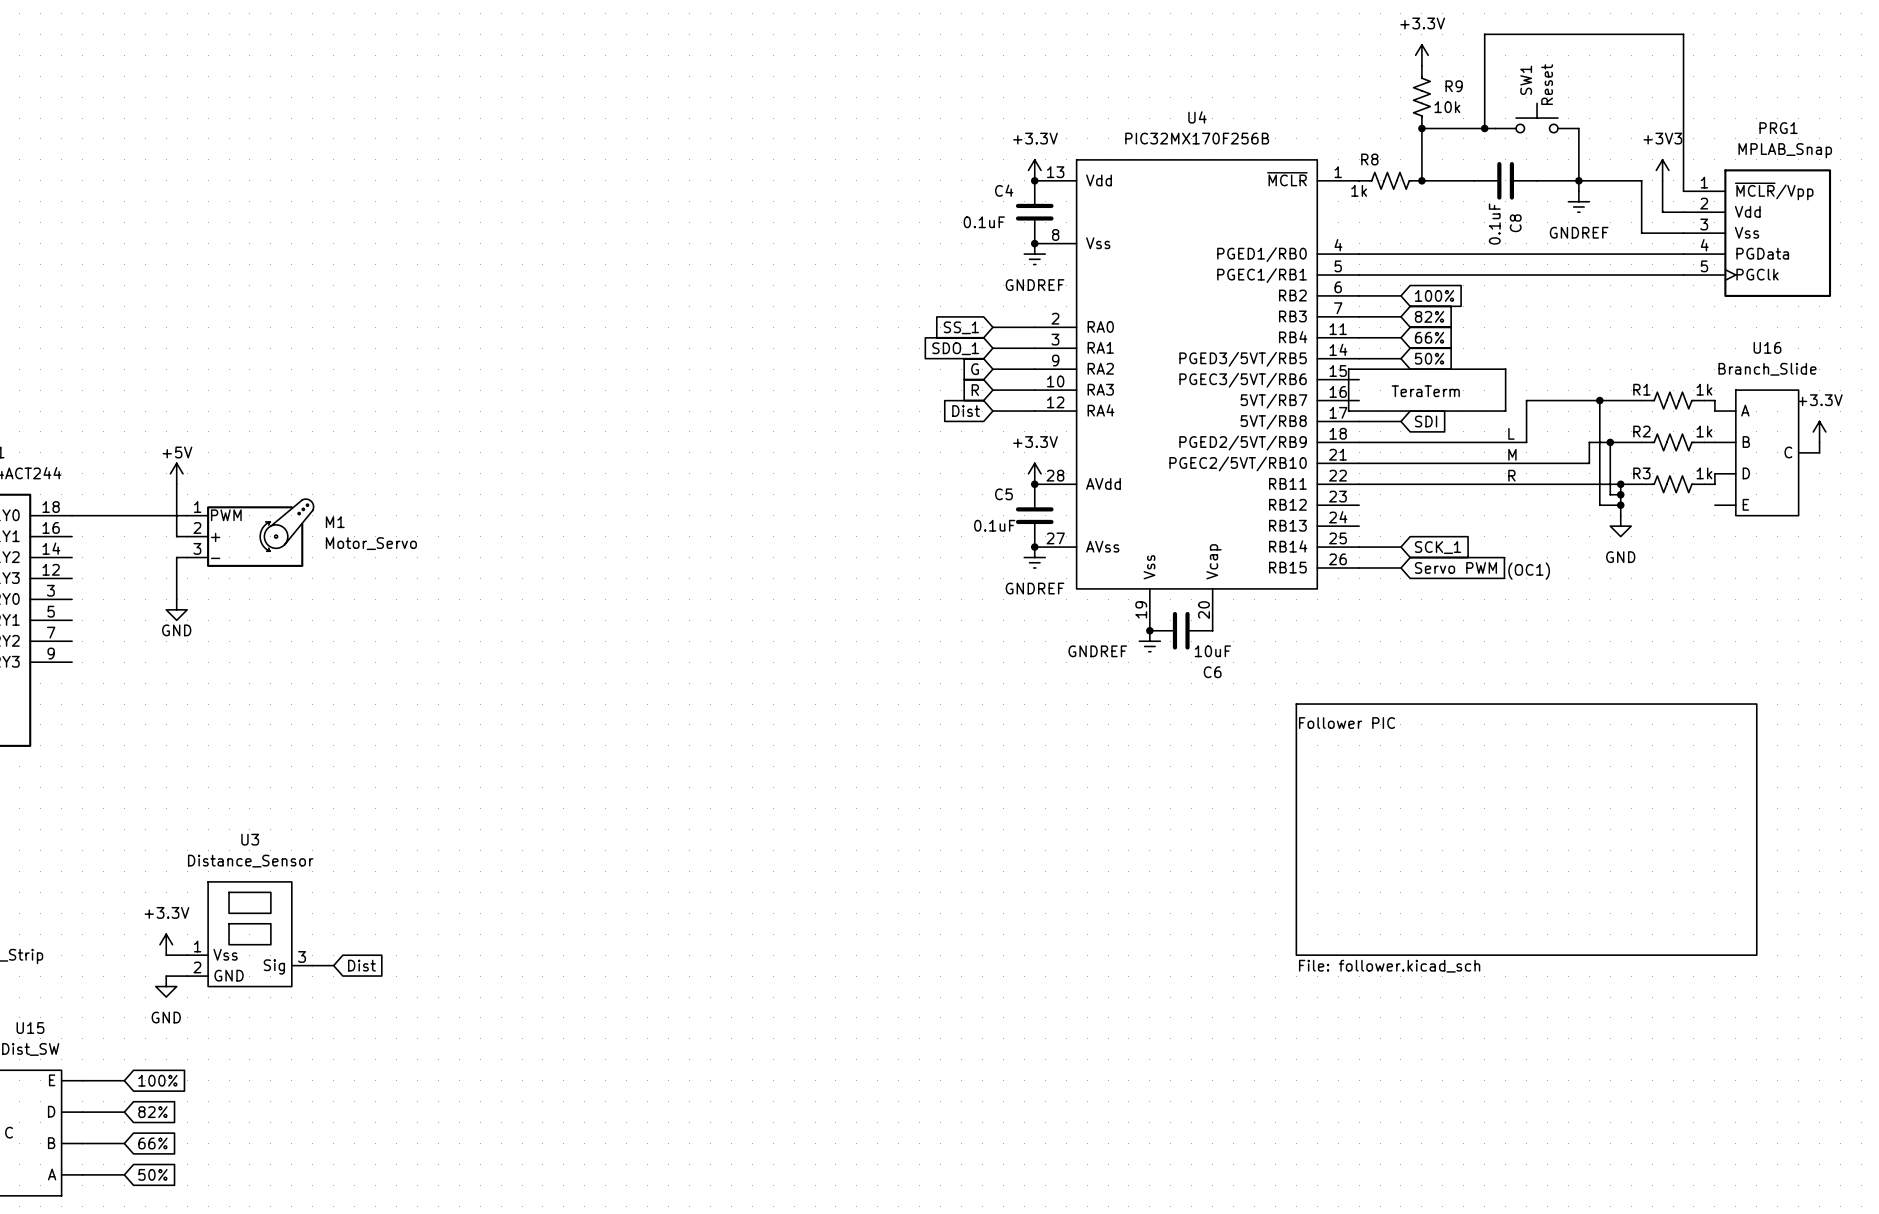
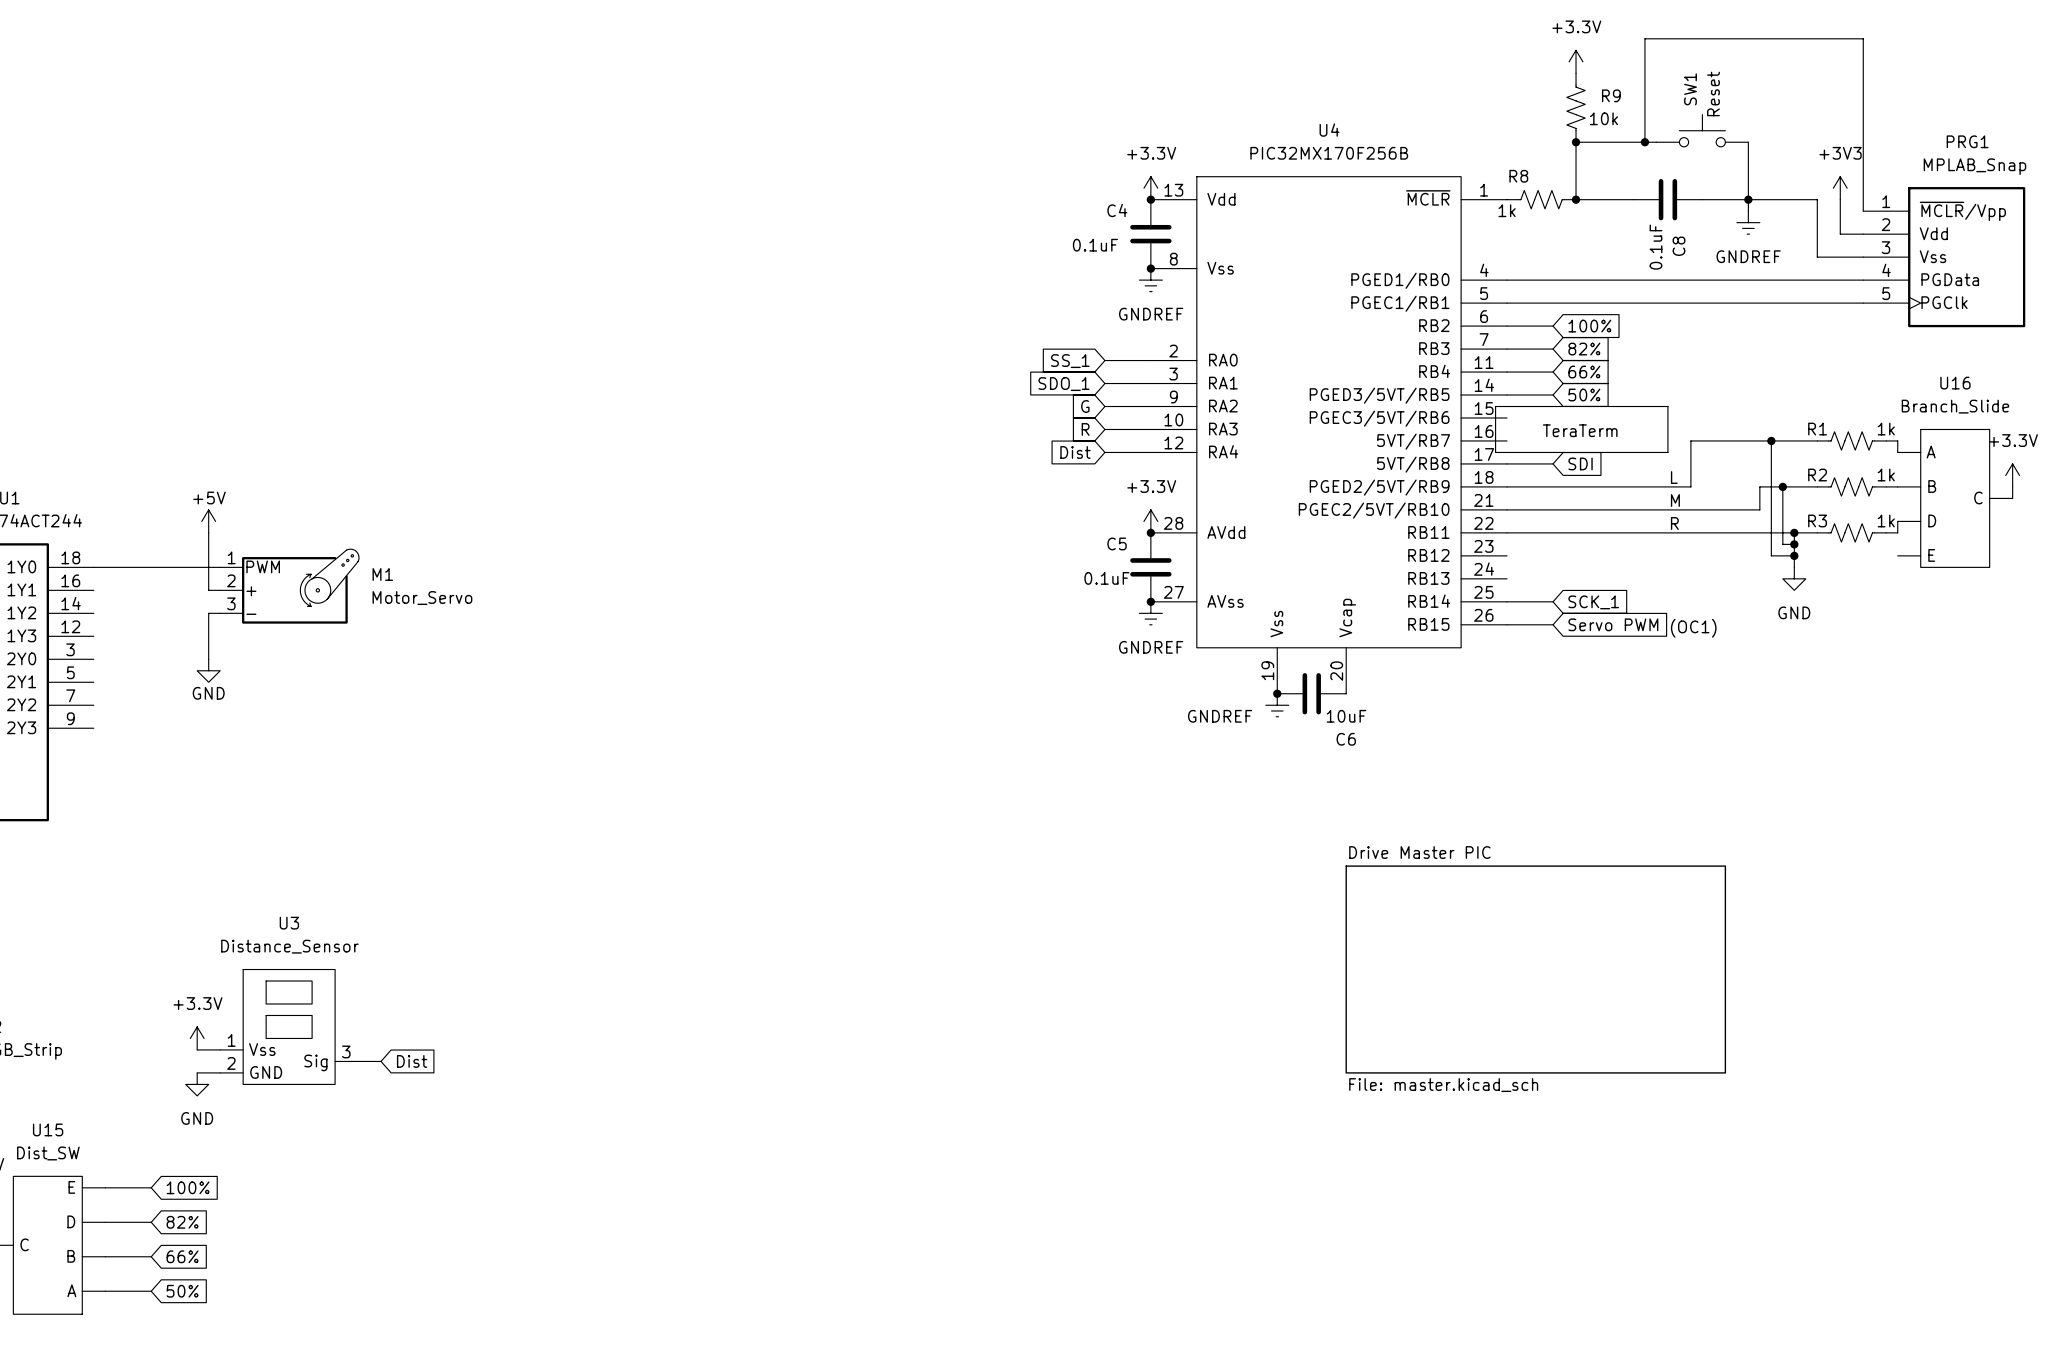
sheet Follower PIC: File: follower.kicad_sch (1526, 829) -> none
sheet Drive Master PIC: none -> File: master.kicad_sch (1535, 969)

